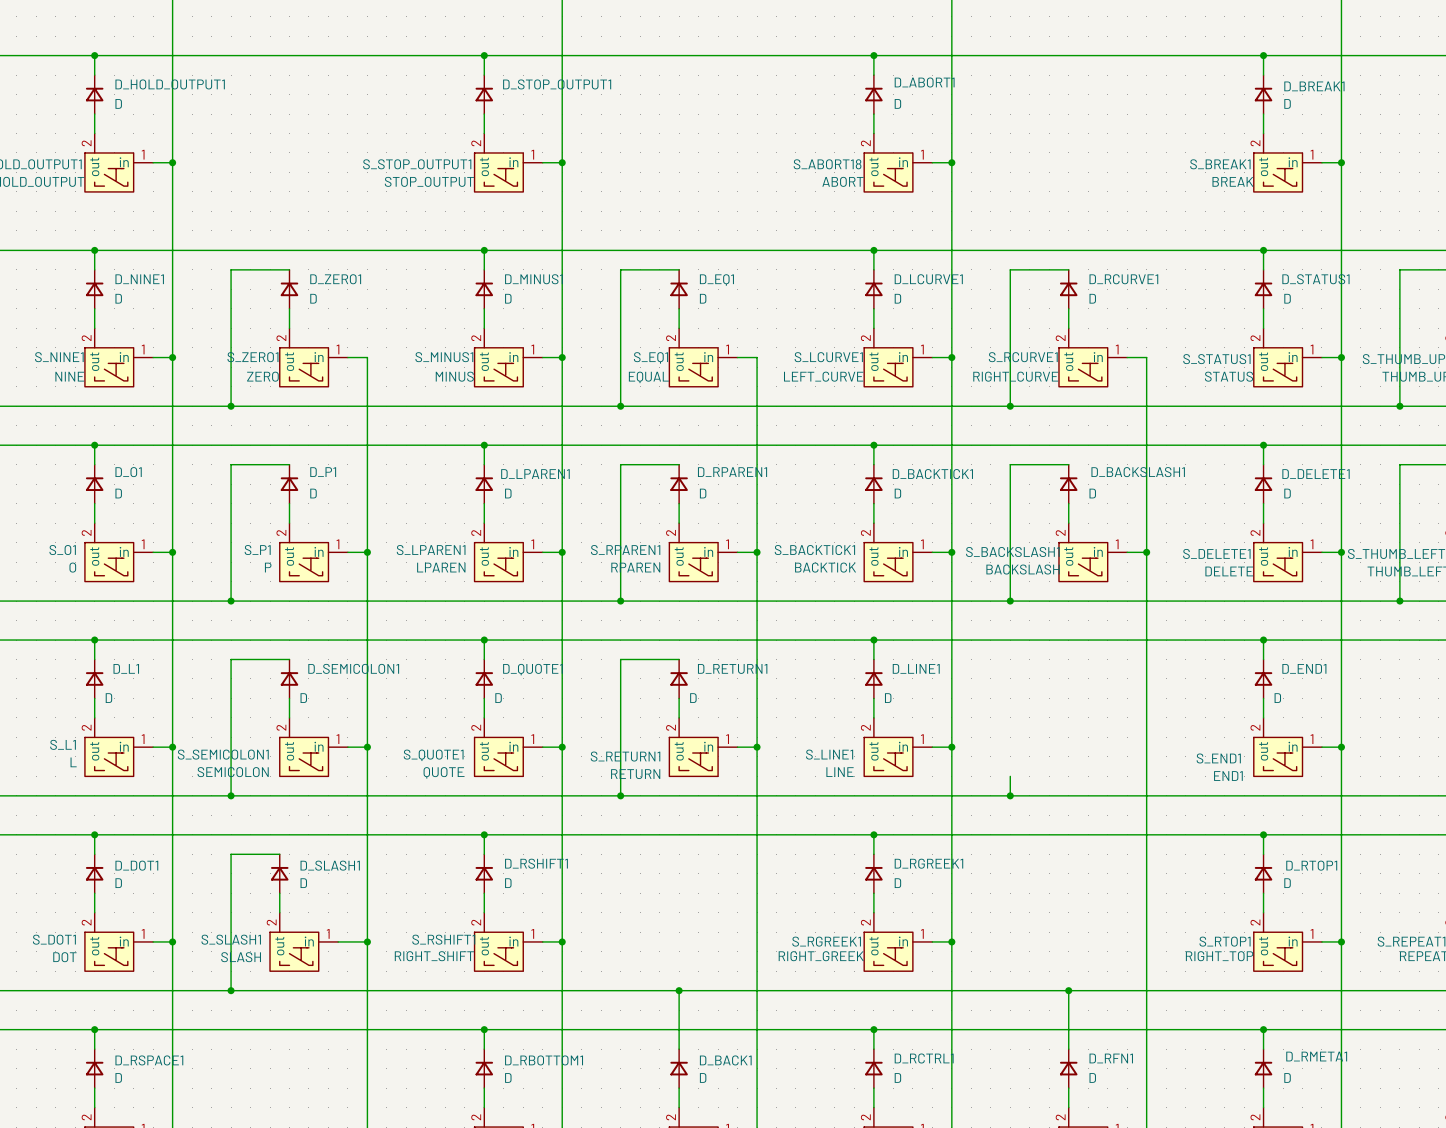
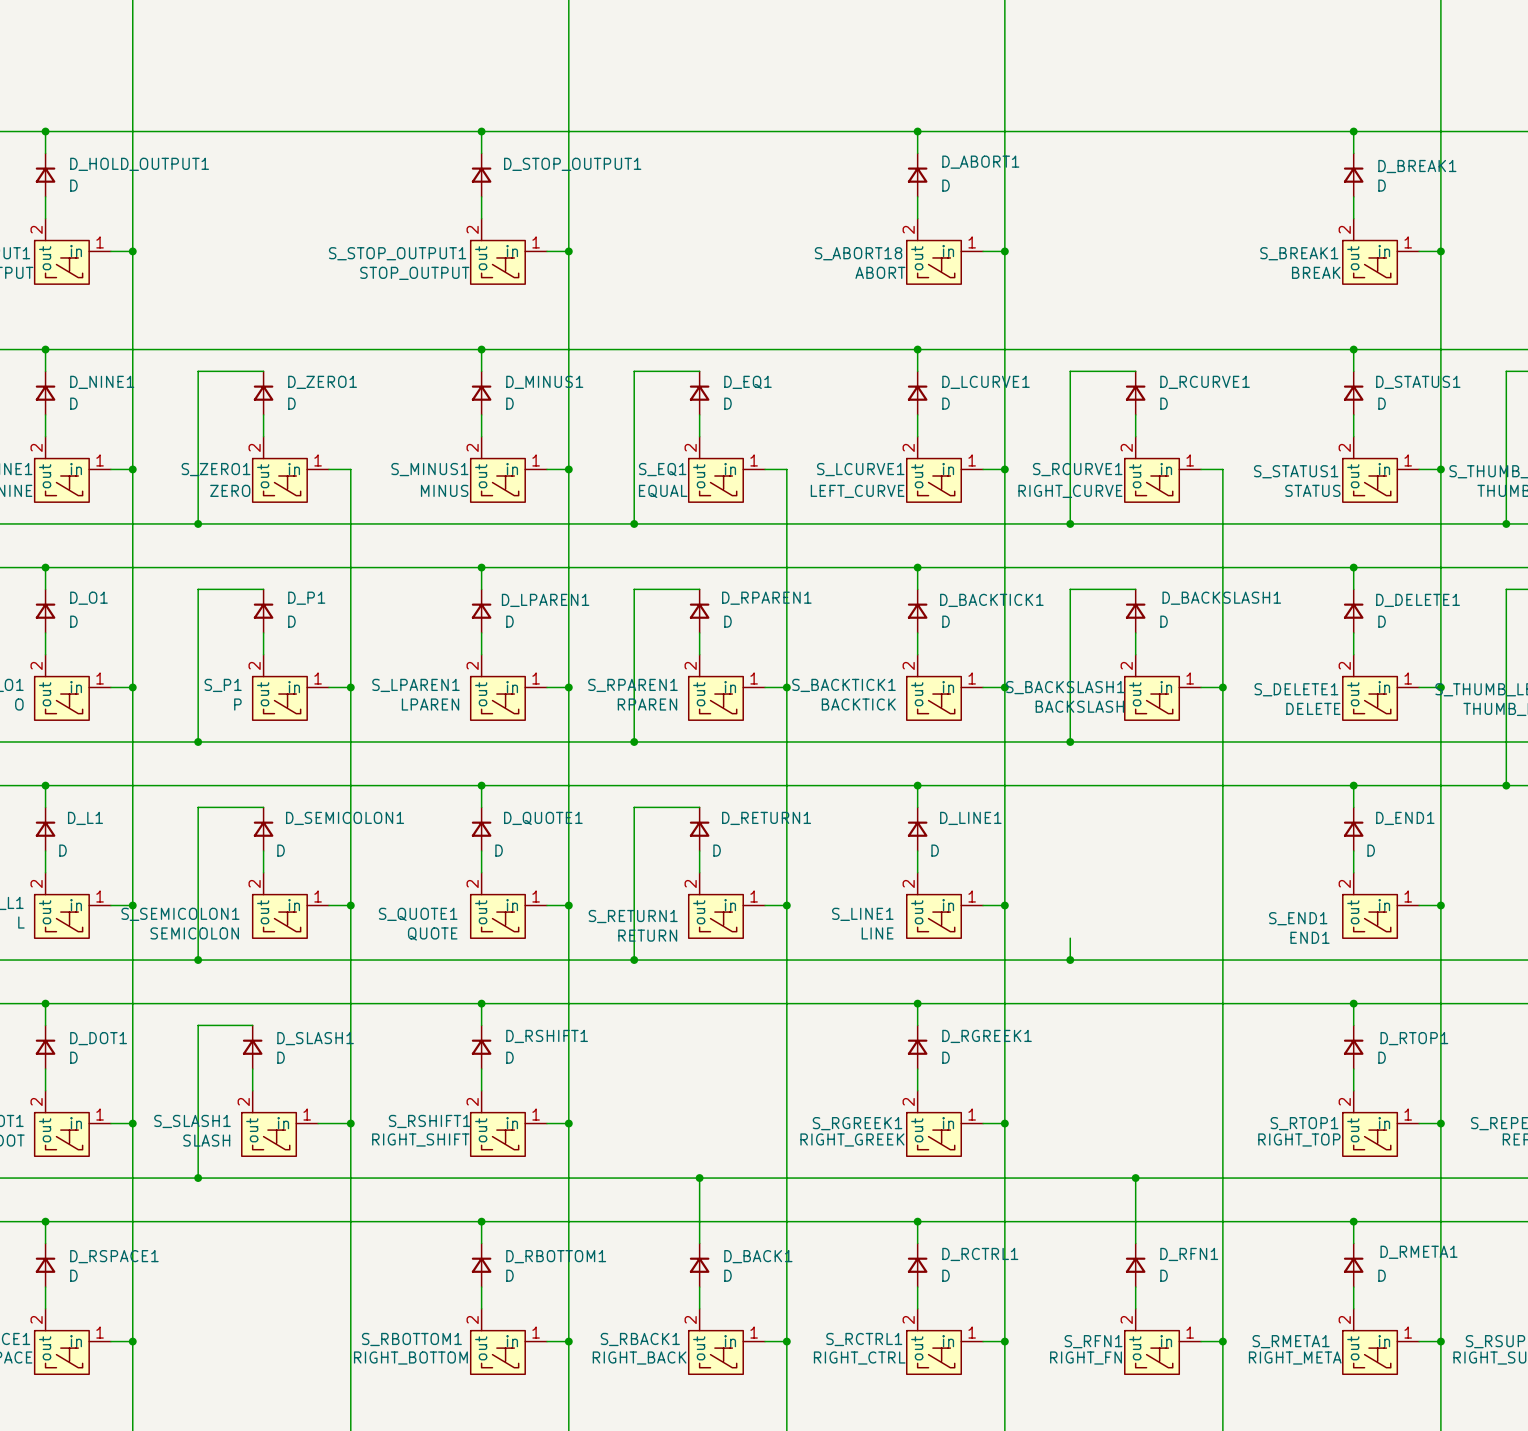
wire: none -> (1506, 741) (1506, 785)
junction position: (1399, 601) -> (1506, 785)

